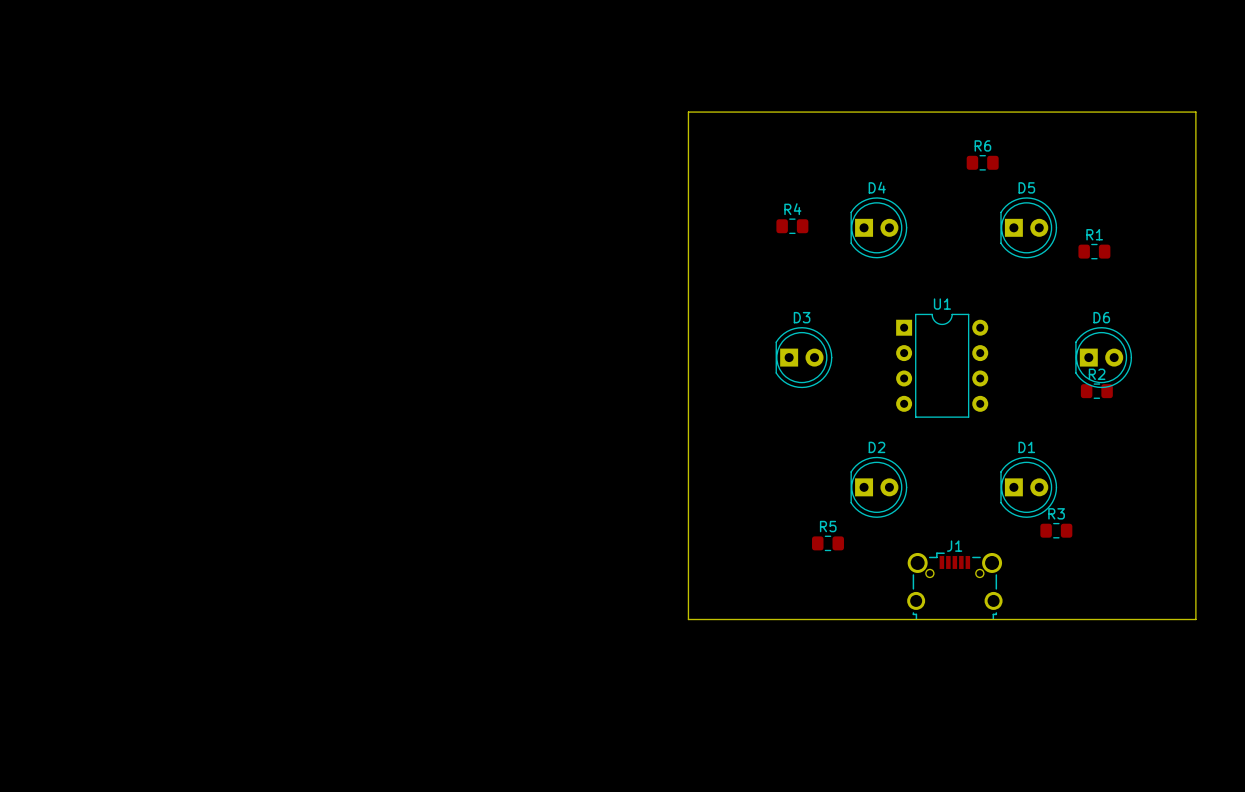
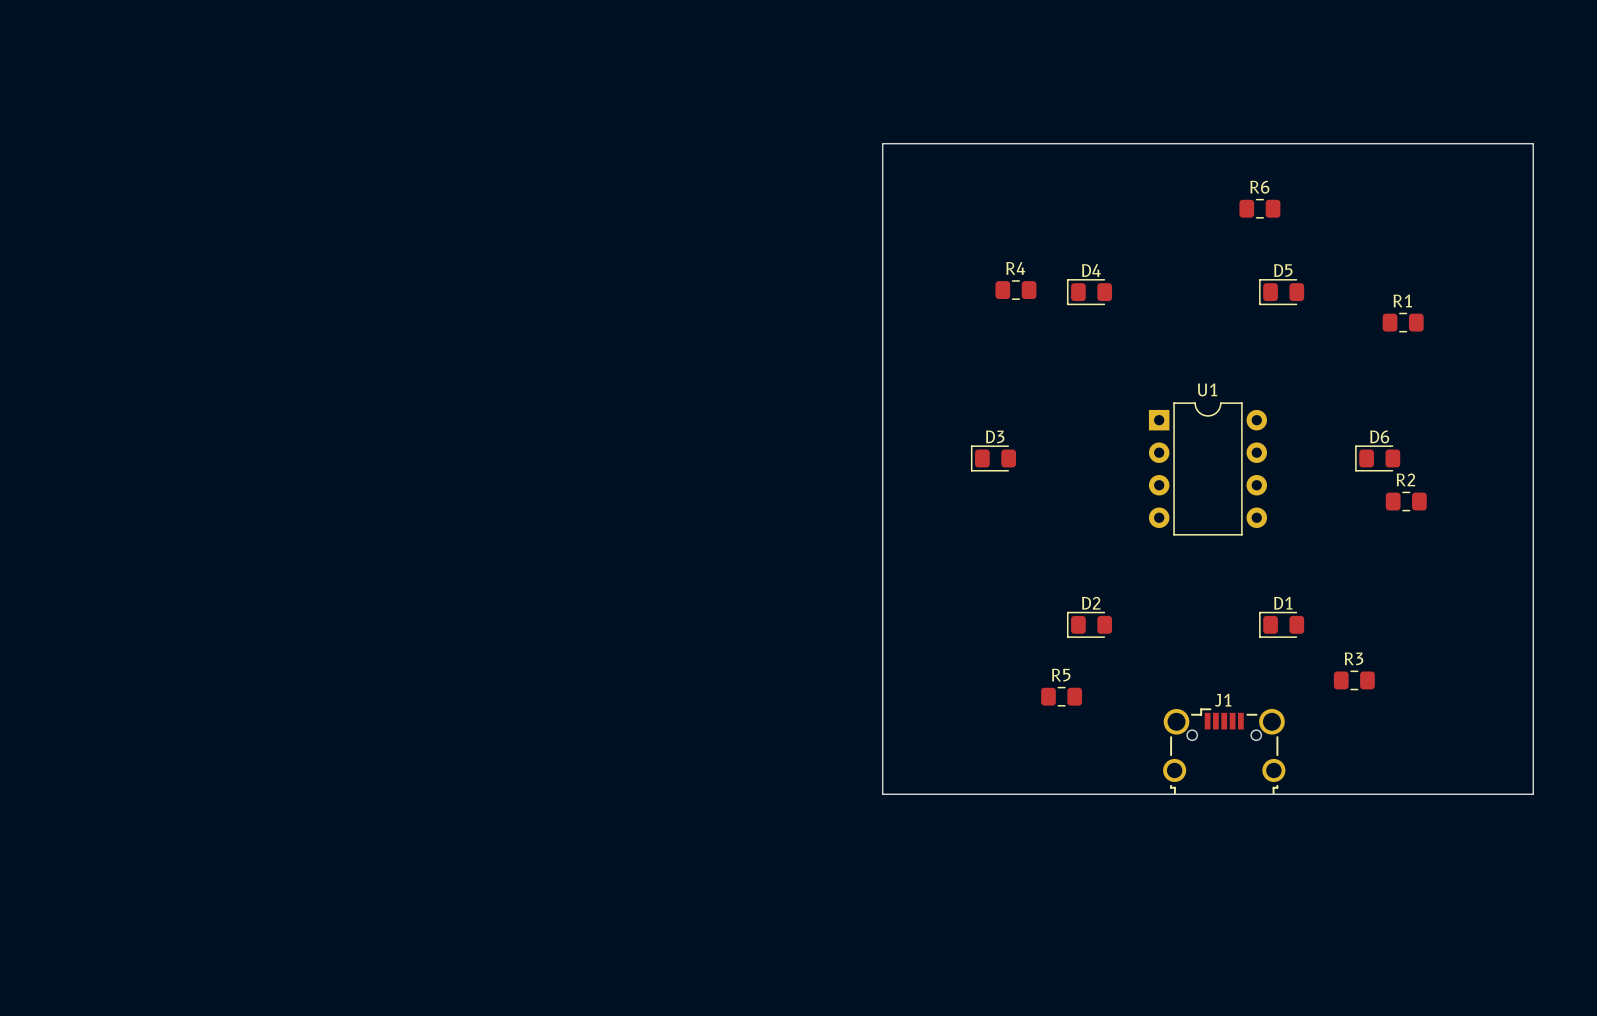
D4 name position: D4 (877, 187) -> D4 (1091, 270)
D5 name position: D5 (1026, 187) -> D5 (1283, 270)
D4 footprint: [850, 197, 908, 259] -> [1066, 279, 1113, 306]
D5 footprint: [1000, 197, 1058, 259] -> [1259, 279, 1305, 306]
D3 name position: D3 (802, 317) -> D3 (995, 436)
D6 name position: D6 (1101, 317) -> D6 (1379, 436)
D3 footprint: [775, 327, 833, 389] -> [970, 445, 1017, 472]
D6 footprint: [1075, 327, 1132, 389] -> [1355, 445, 1401, 472]
D2 name position: D2 (876, 447) -> D2 (1091, 603)
D1 name position: D1 (1026, 447) -> D1 (1283, 603)
D2 footprint: [850, 456, 908, 518] -> [1066, 611, 1113, 638]
D1 footprint: [1000, 456, 1058, 518] -> [1259, 611, 1305, 638]

